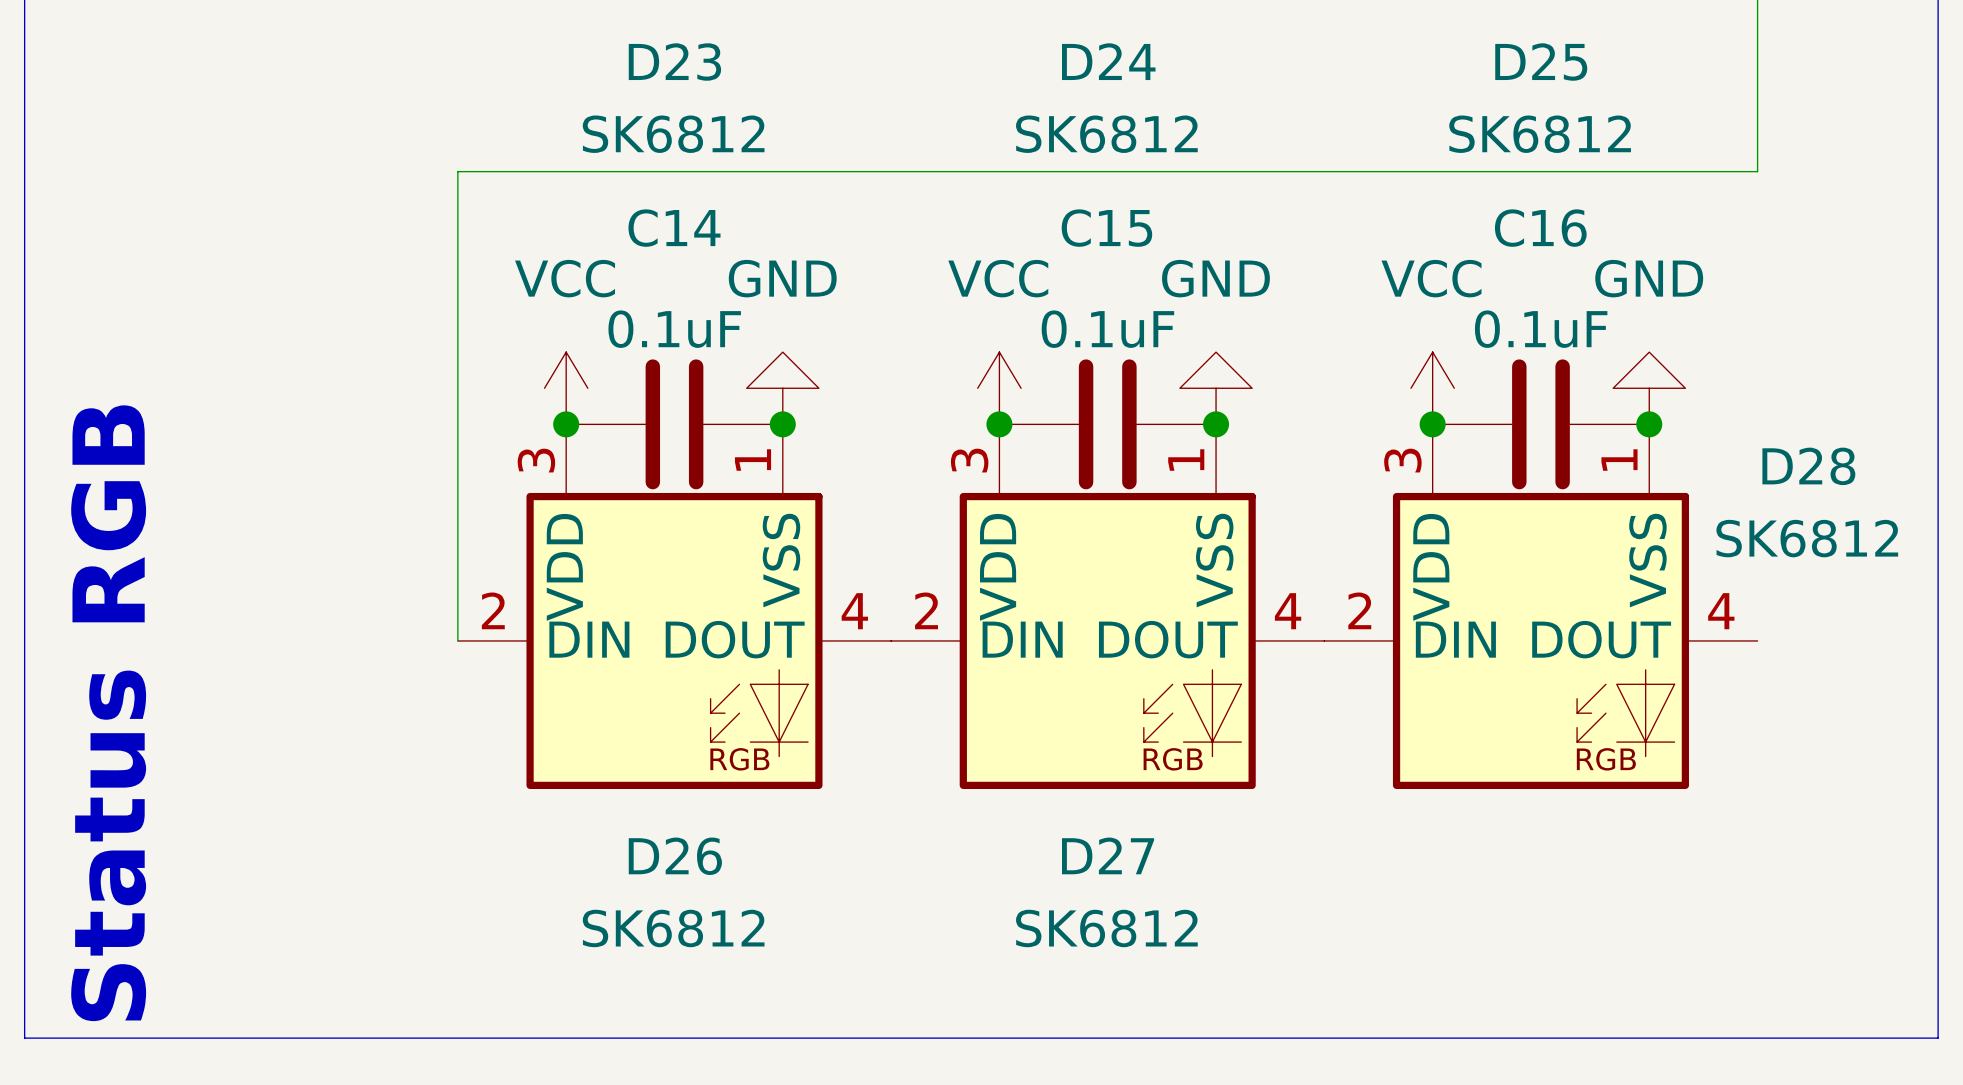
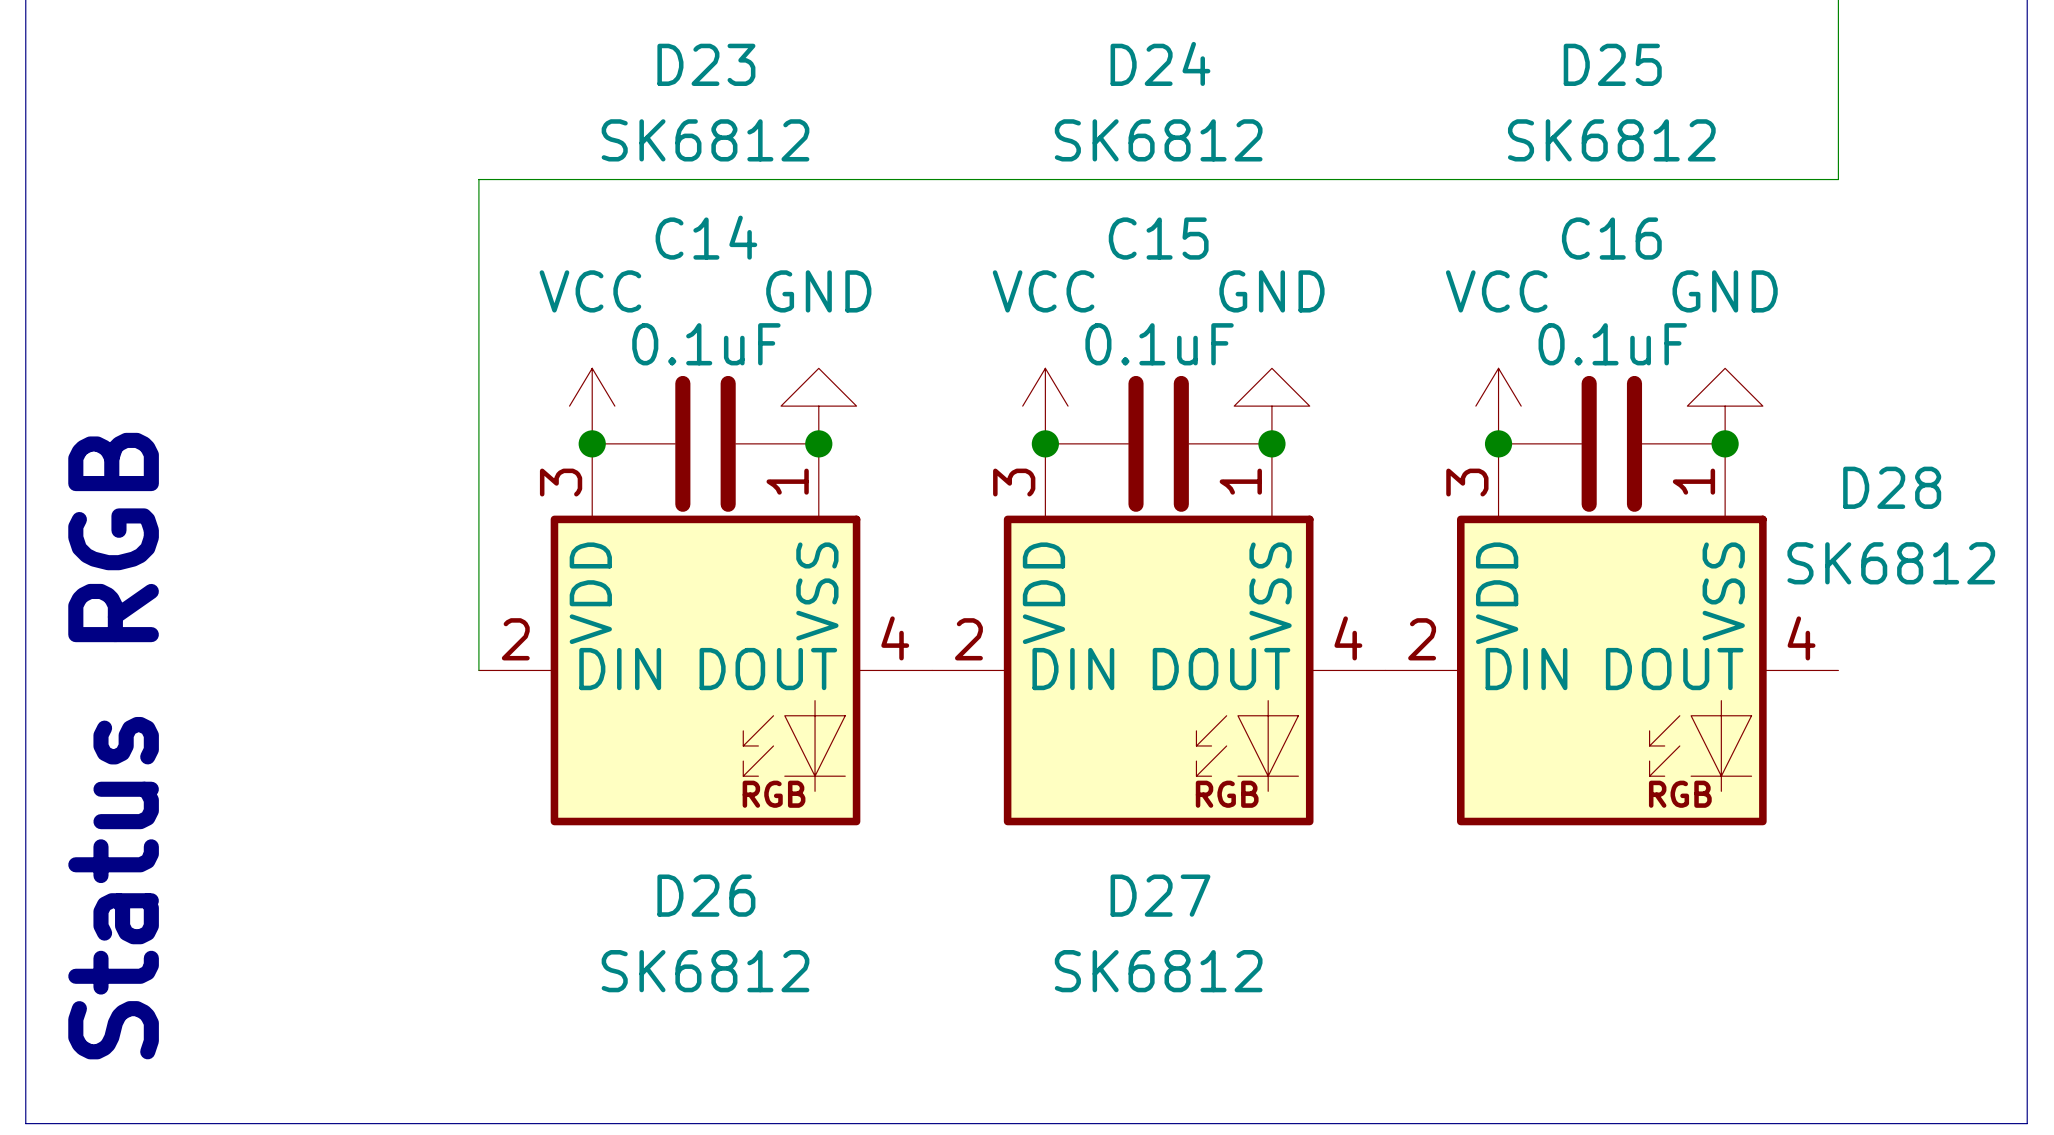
line: (24, 1038) (1938, 1038) -> (25, 1085) (25, 1123) (2027, 1123) (2027, 1085)

